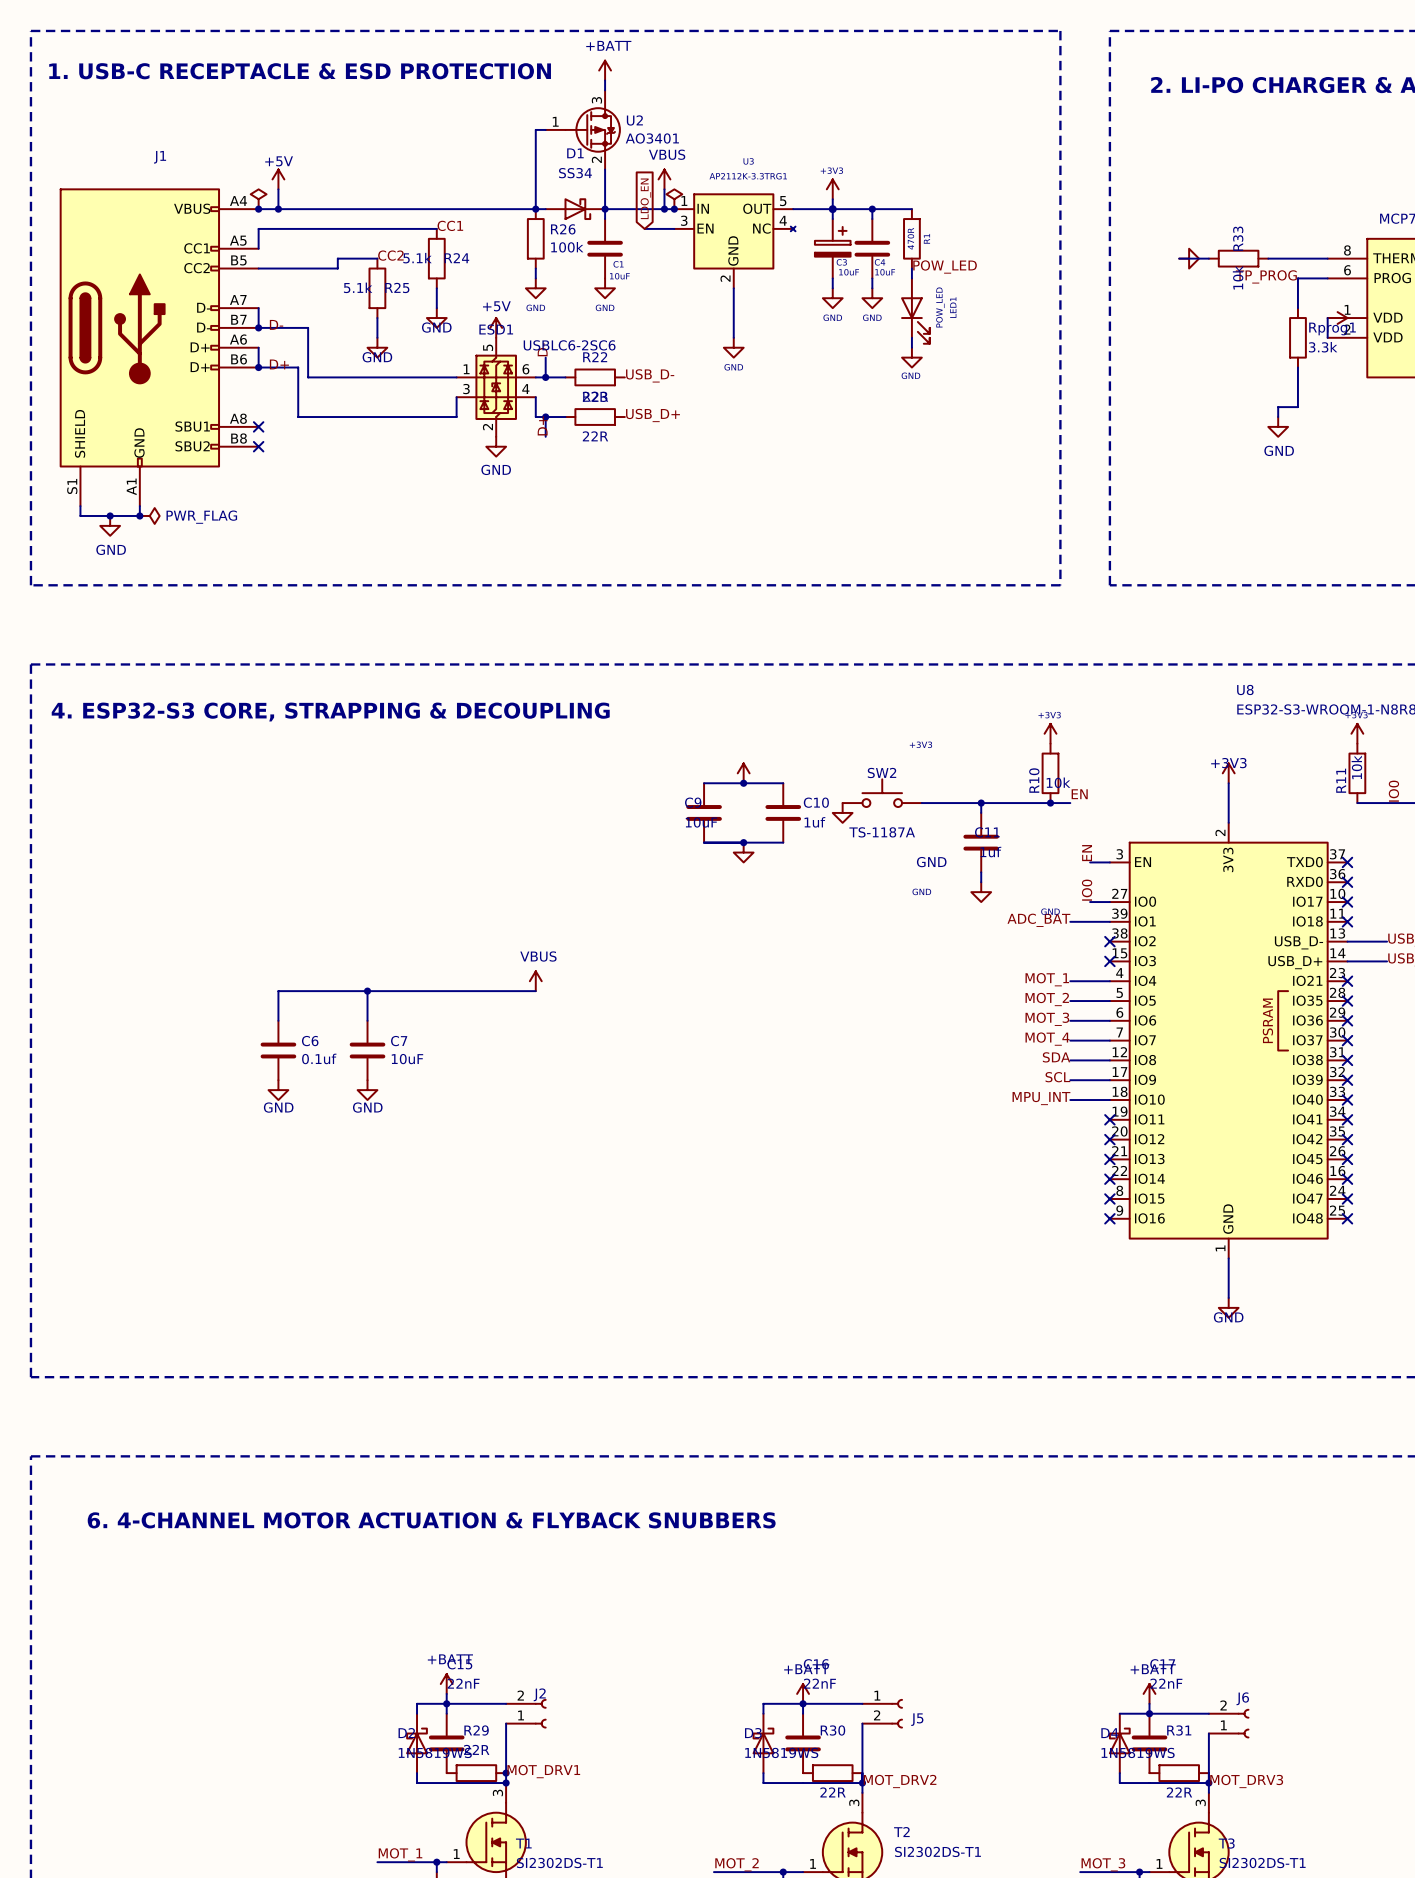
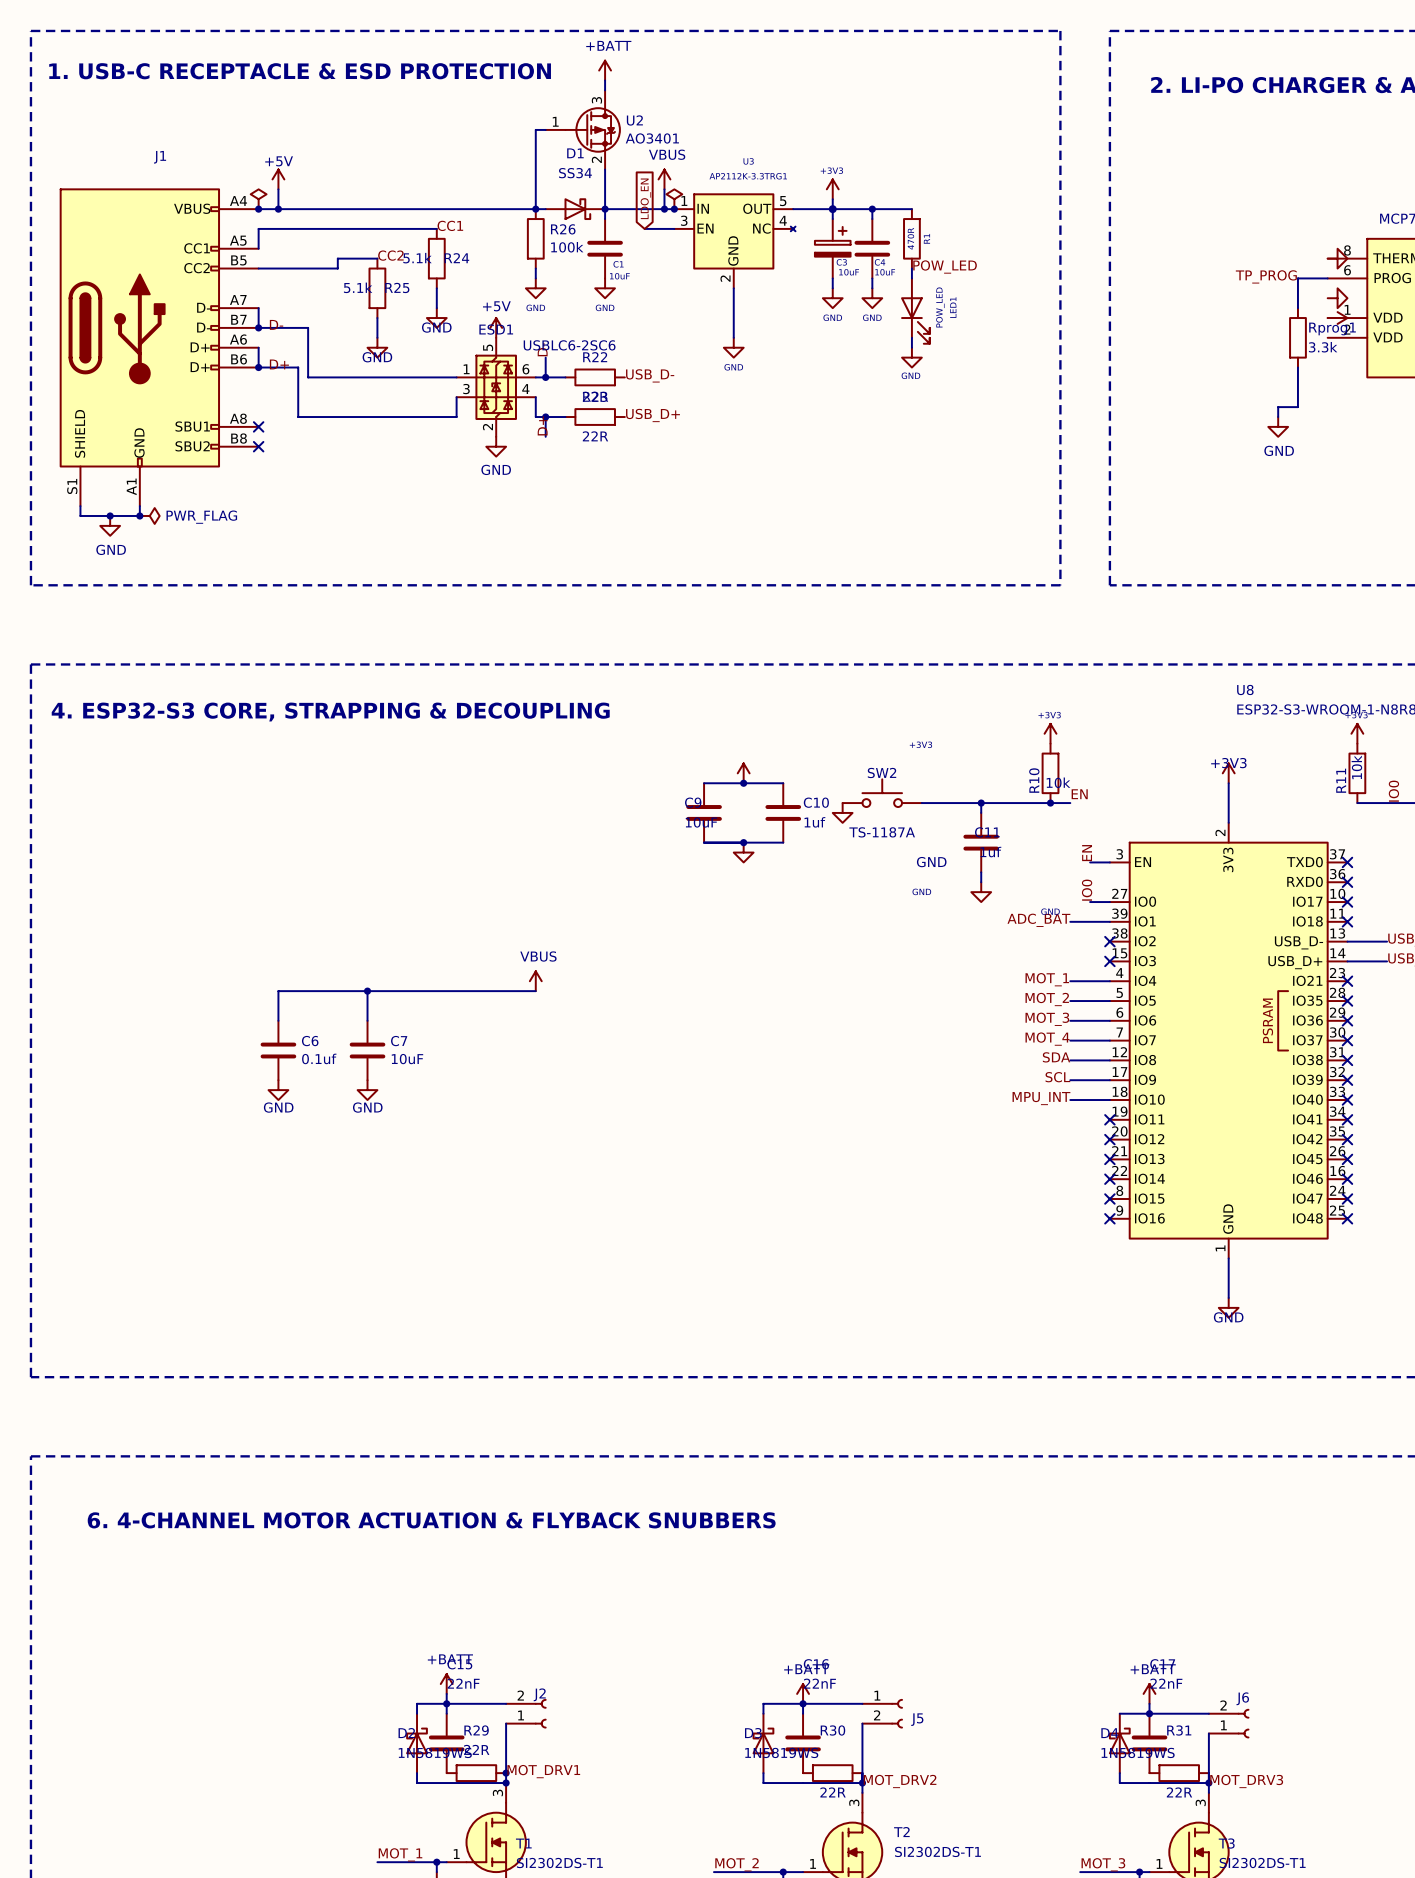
wire: (1179, 258) (1208, 258) -> none
power symbol: (1189, 258) -> none
R33: 10k (1238, 258) -> none
wire: (1268, 258) (1327, 258) -> none
power symbol: none -> (1337, 258)
power symbol: none -> (1337, 298)
wire: (1327, 318) (1327, 337) -> none

